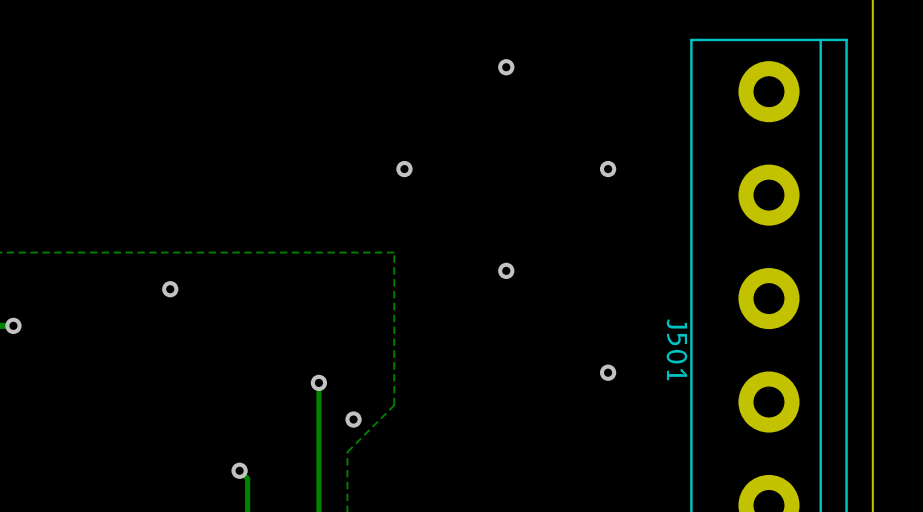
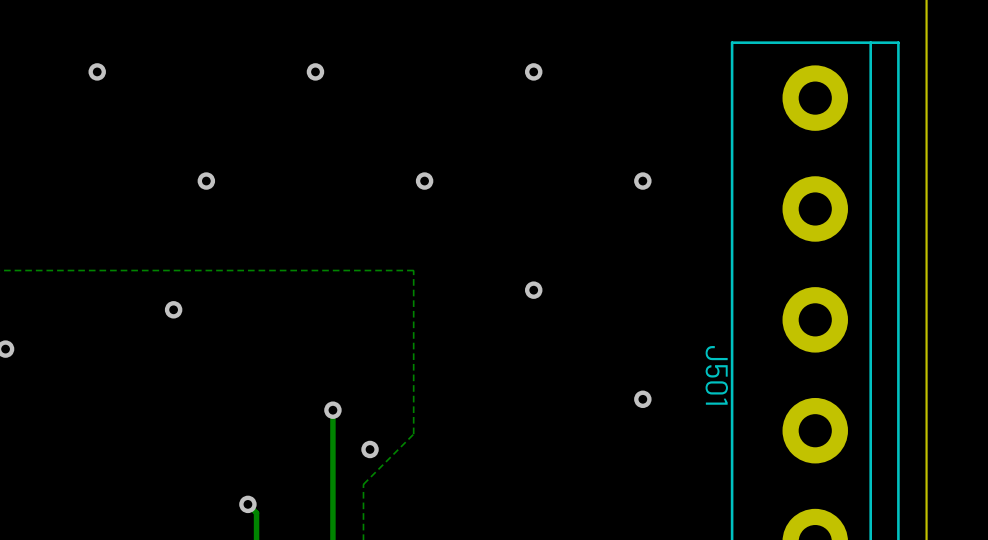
via: none -> (97, 71)
via: none -> (315, 71)
via: none -> (206, 181)

